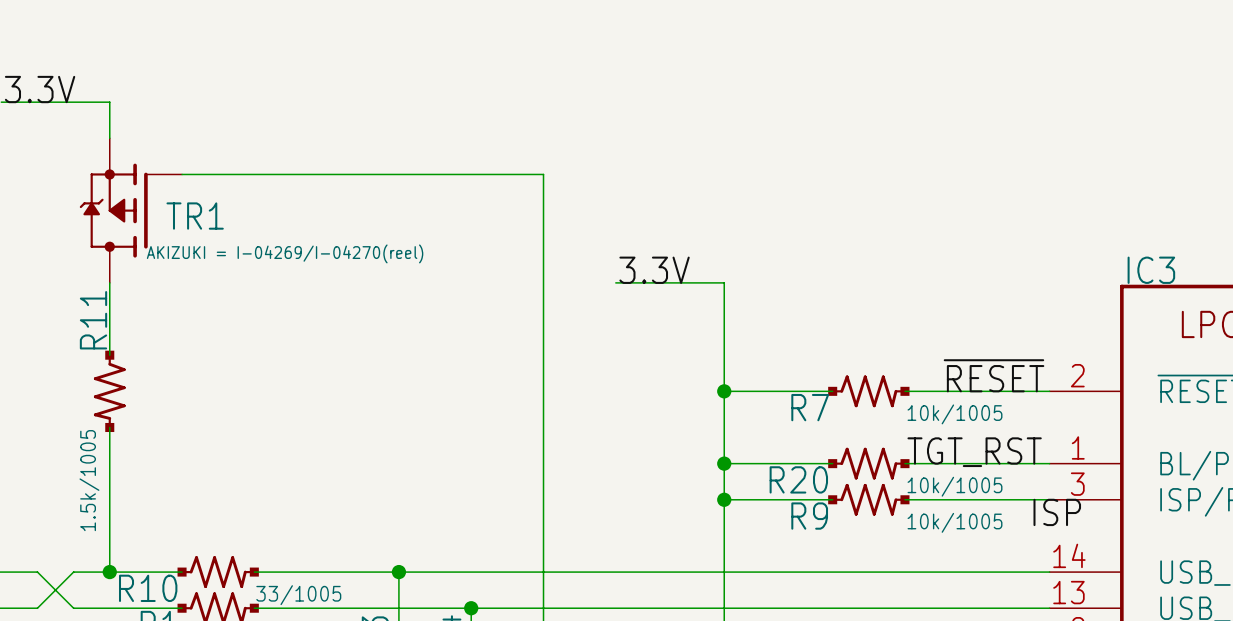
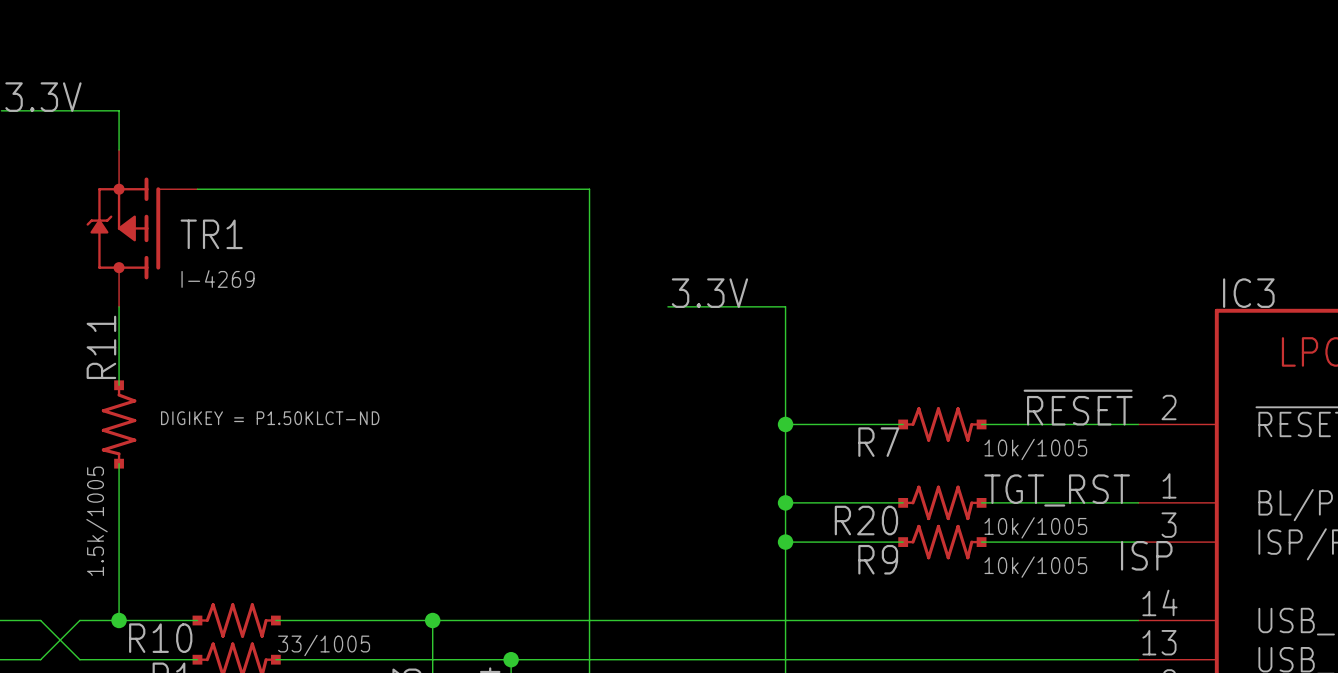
TR1 text: AKIZUKI = I-04269/I-04270(reel) (285, 253) -> none
TR1 value: none -> I-4269 (218, 279)
R11 text: none -> DIGIKEY = P1.50KLCT-ND (270, 418)

